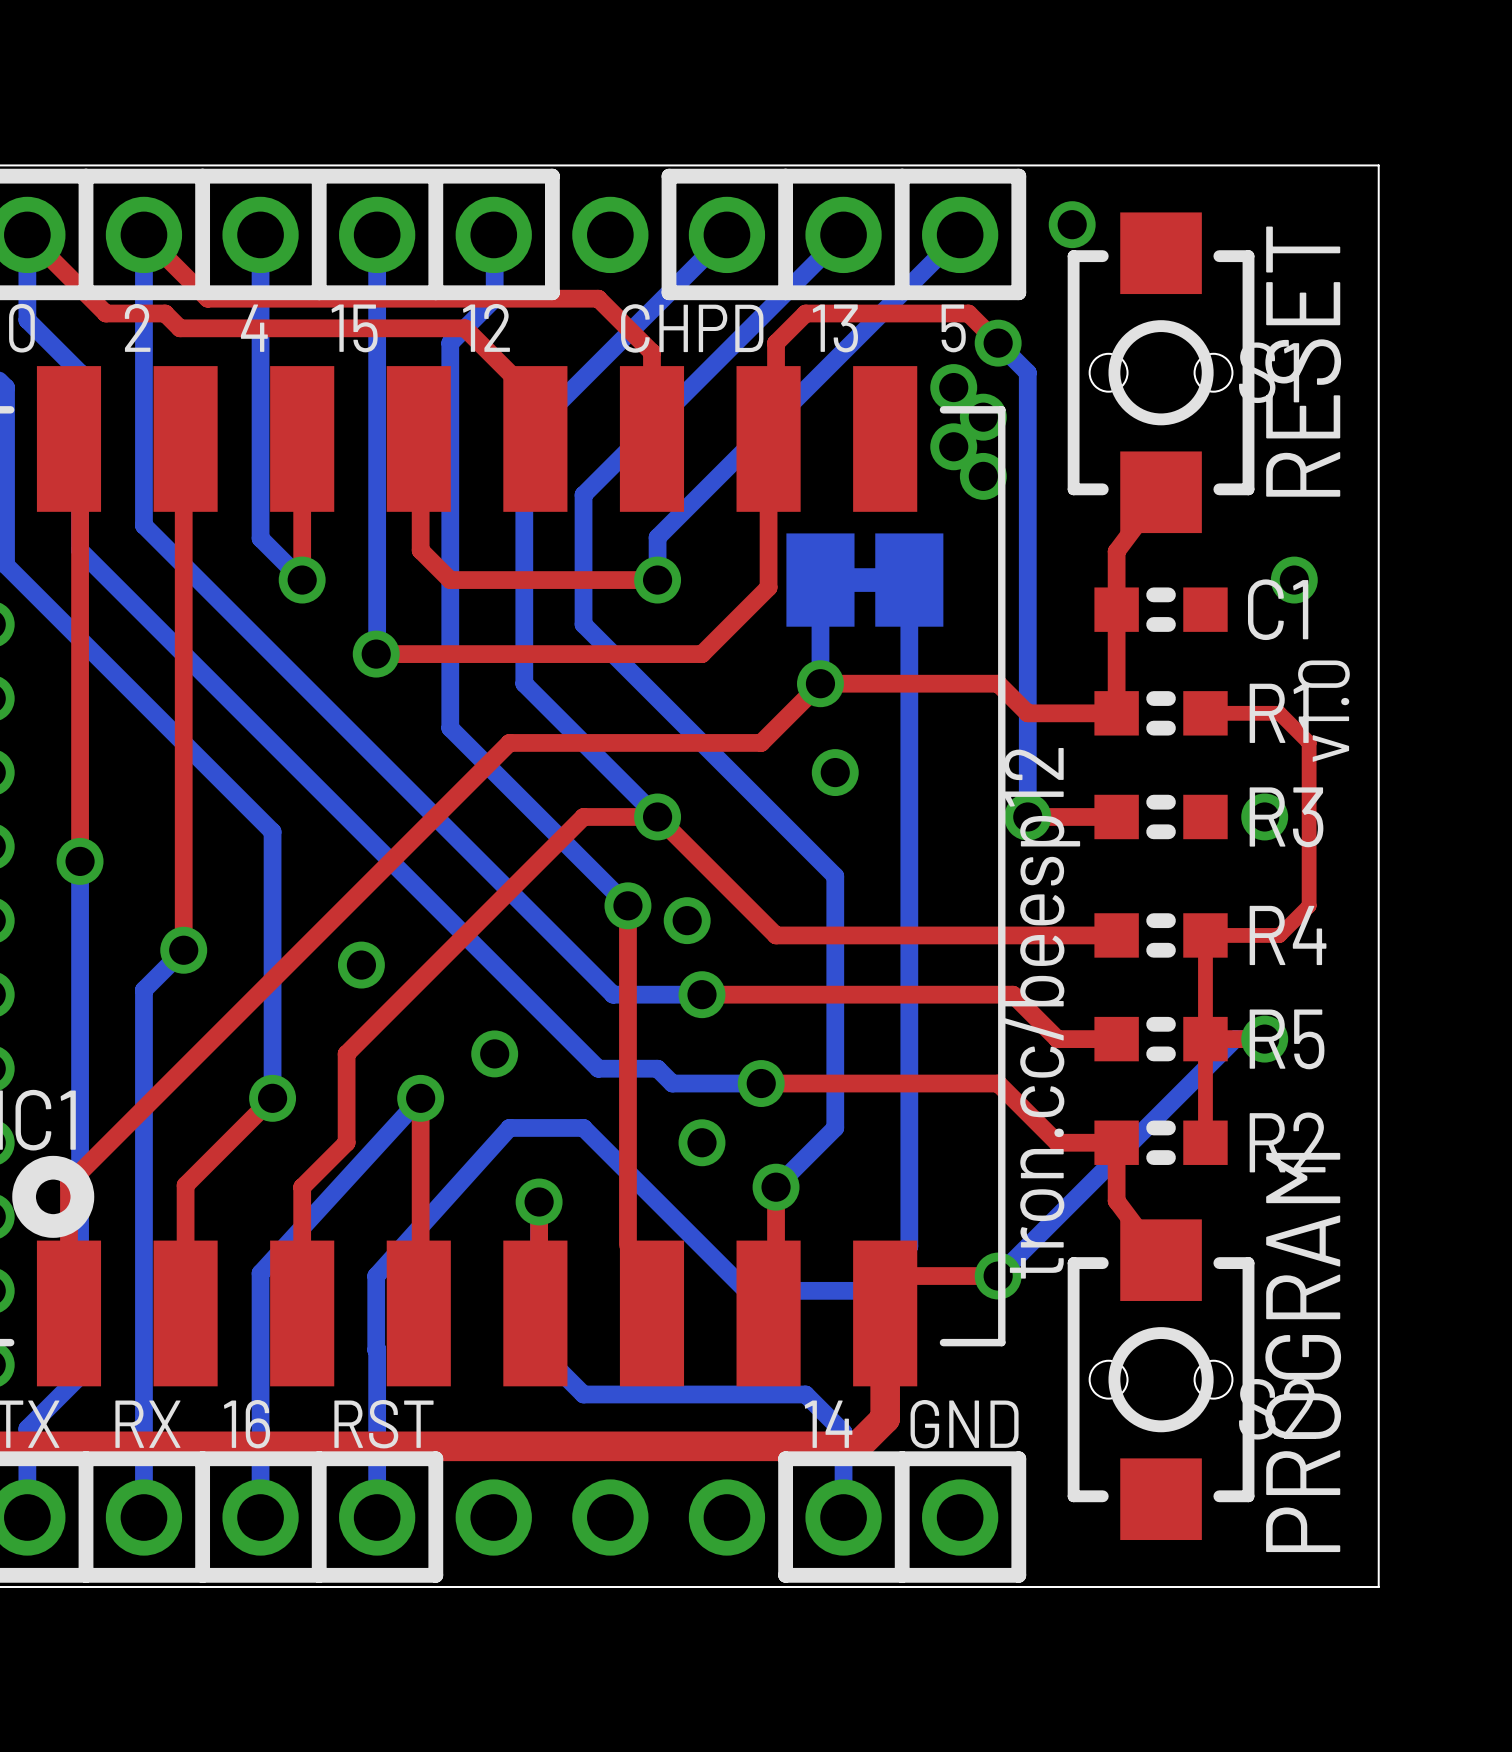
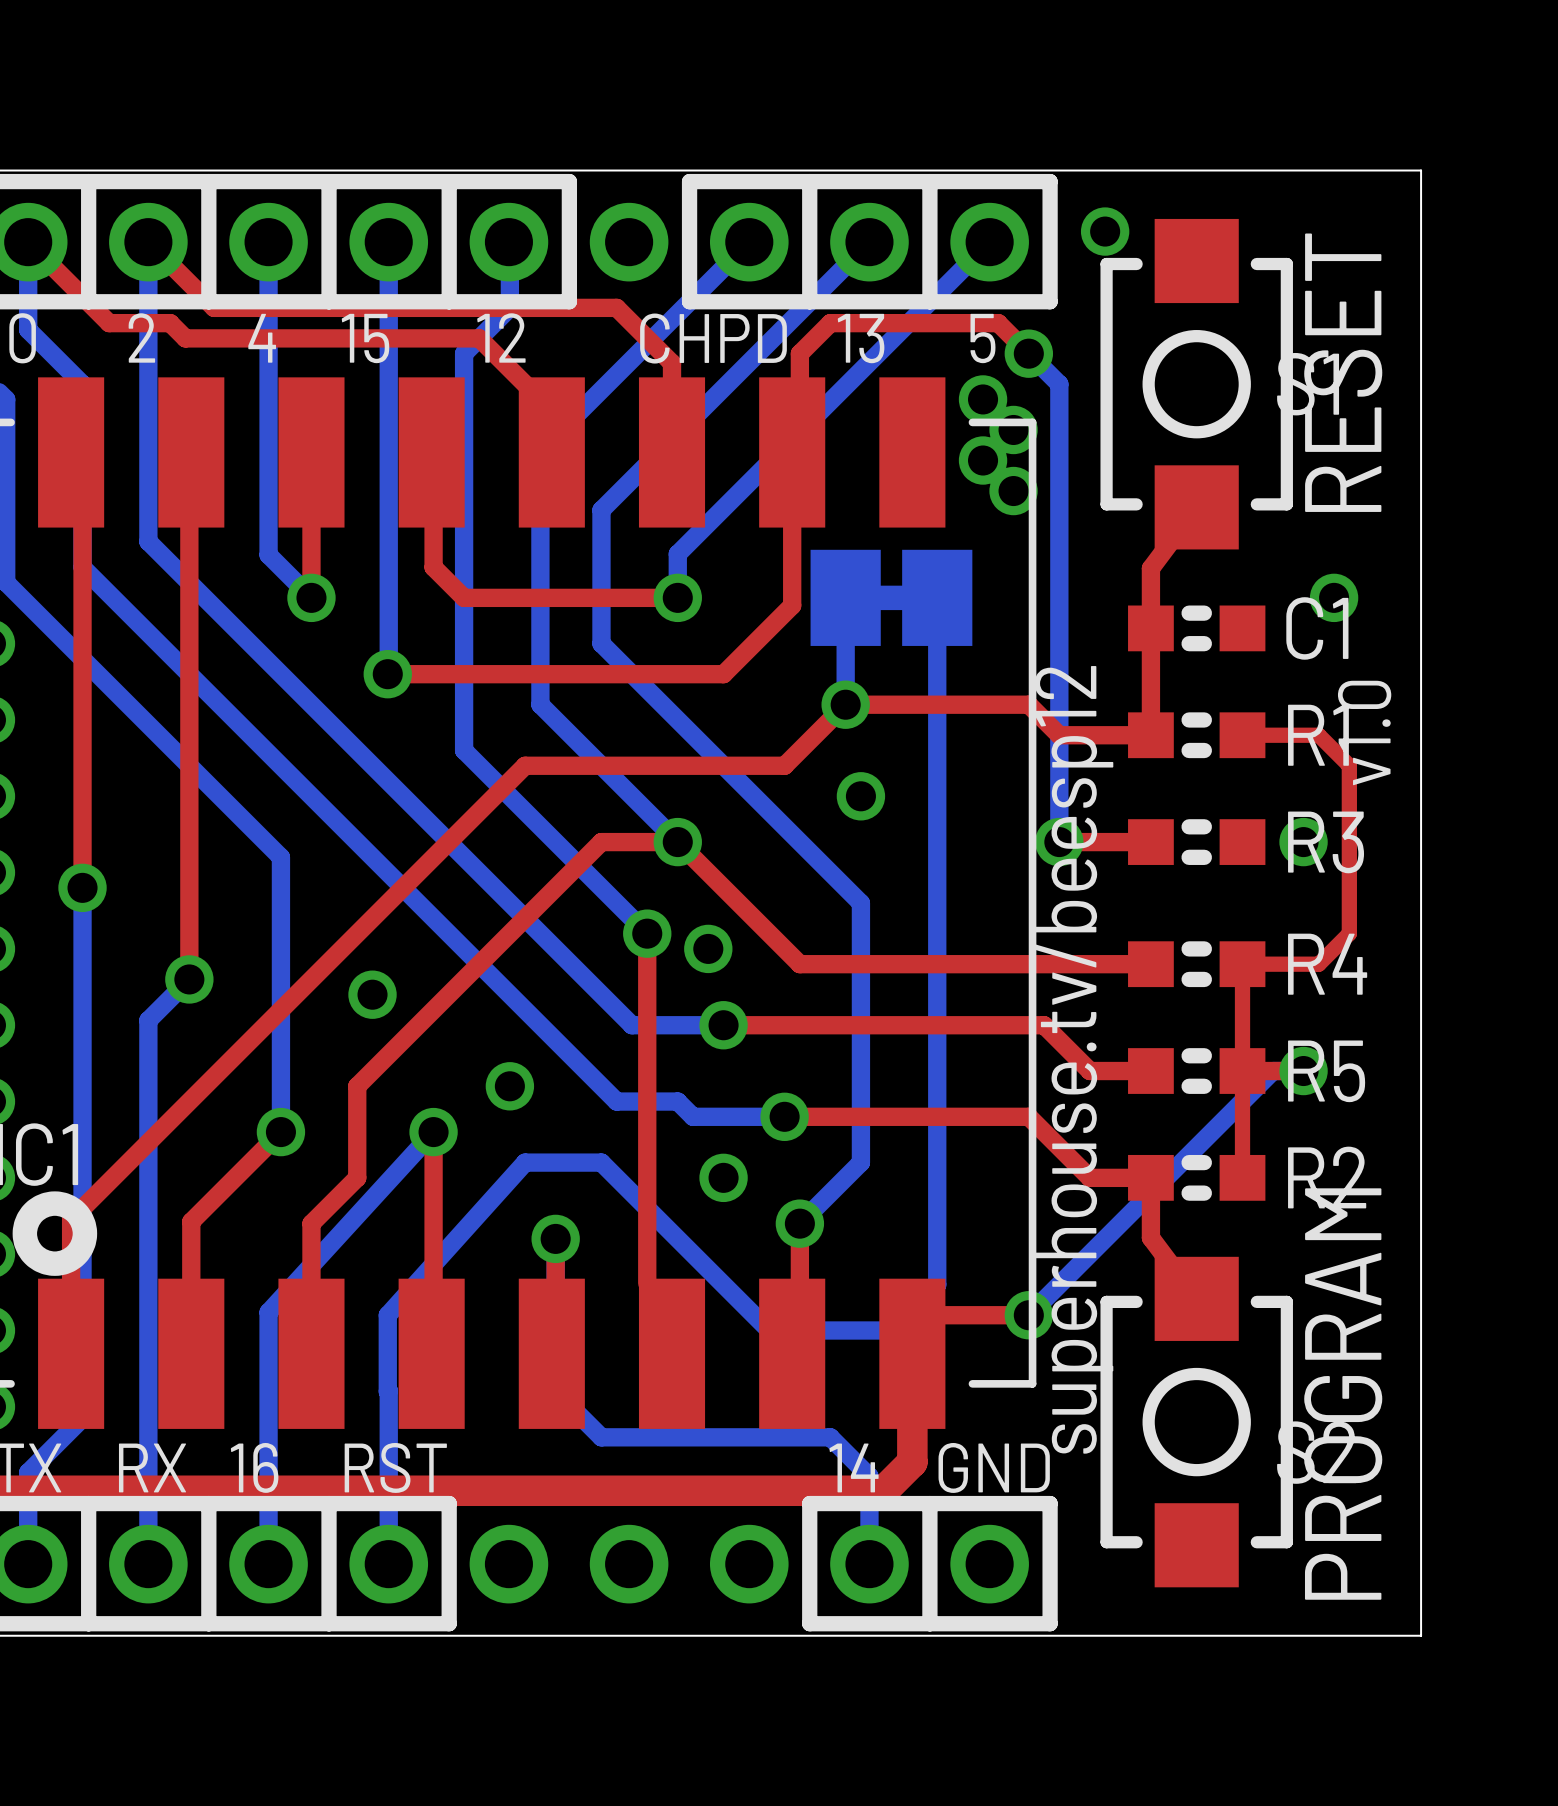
part footprint: [1067, 212, 1255, 534] -> [1100, 218, 1293, 550]
text: tron.cc/beesp12 (1041, 1013) -> none
text: none -> superhouse.tv/beesp12 (1073, 1059)
part footprint: [1067, 1219, 1255, 1541] -> [1100, 1256, 1293, 1588]

